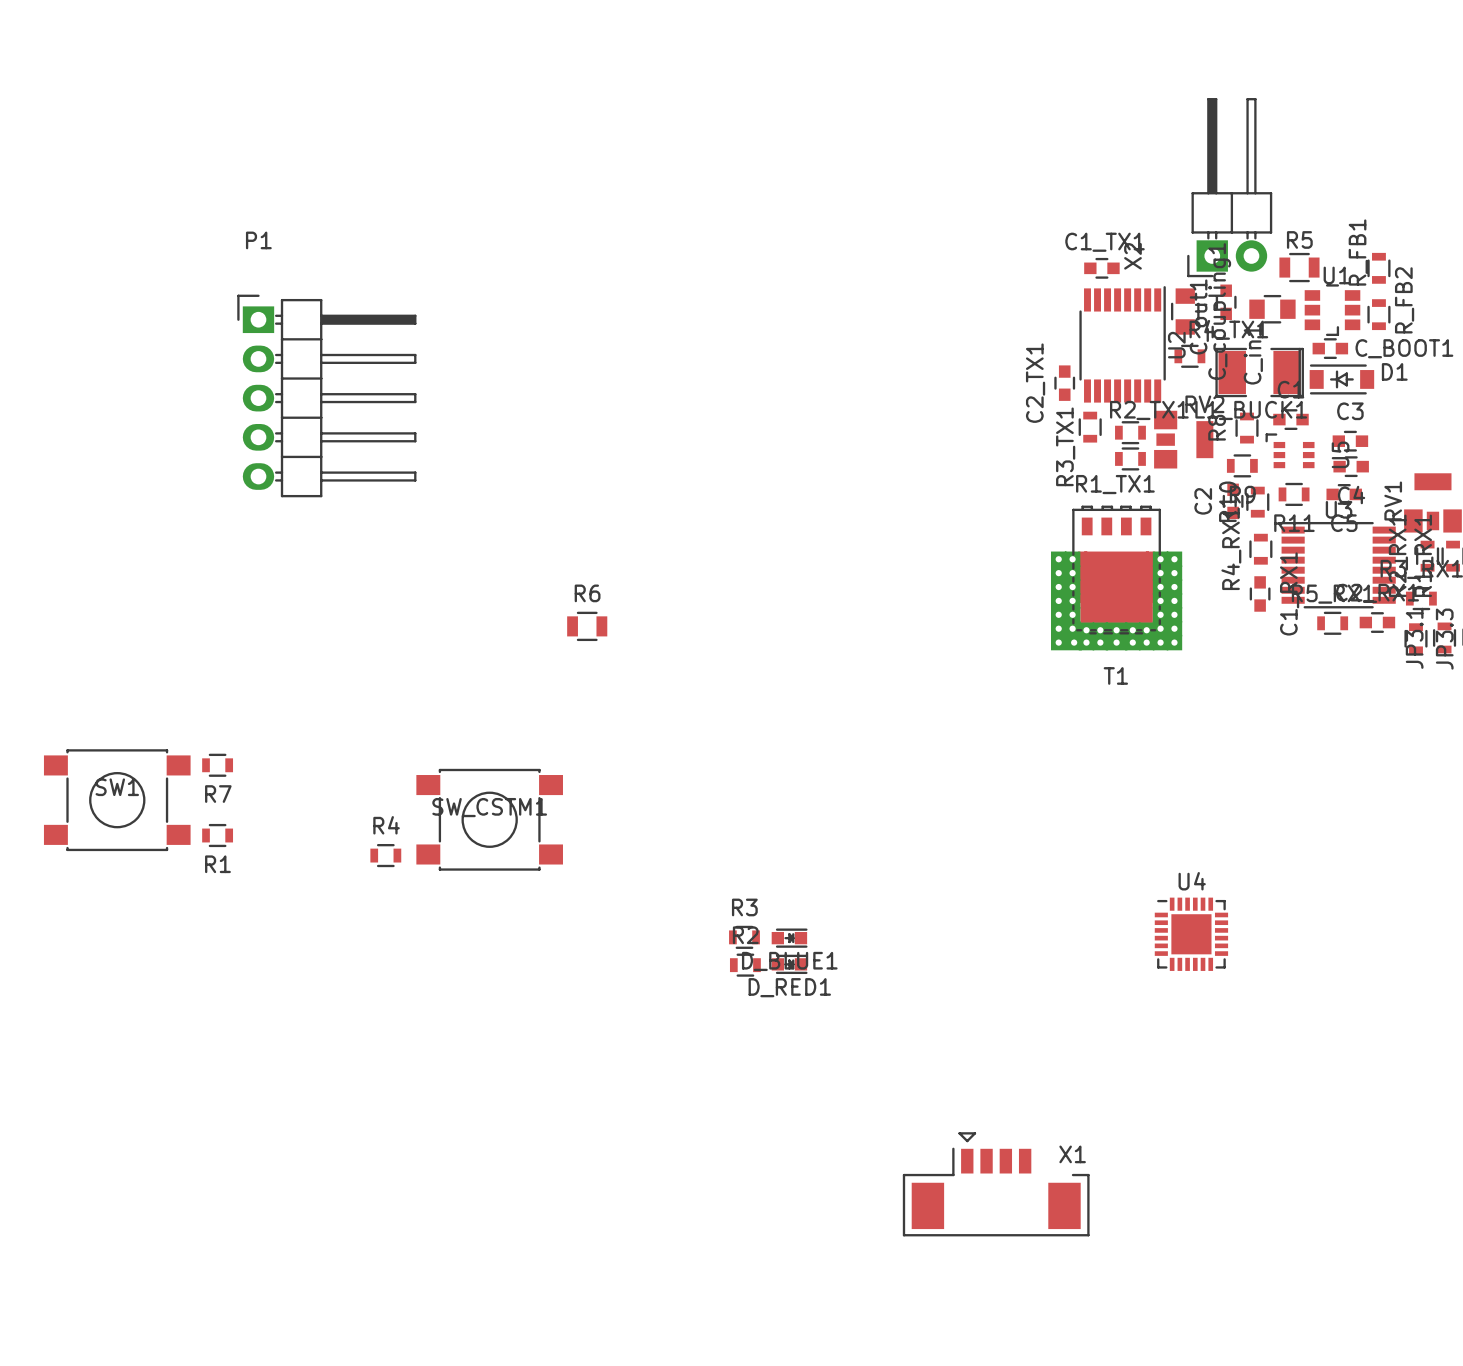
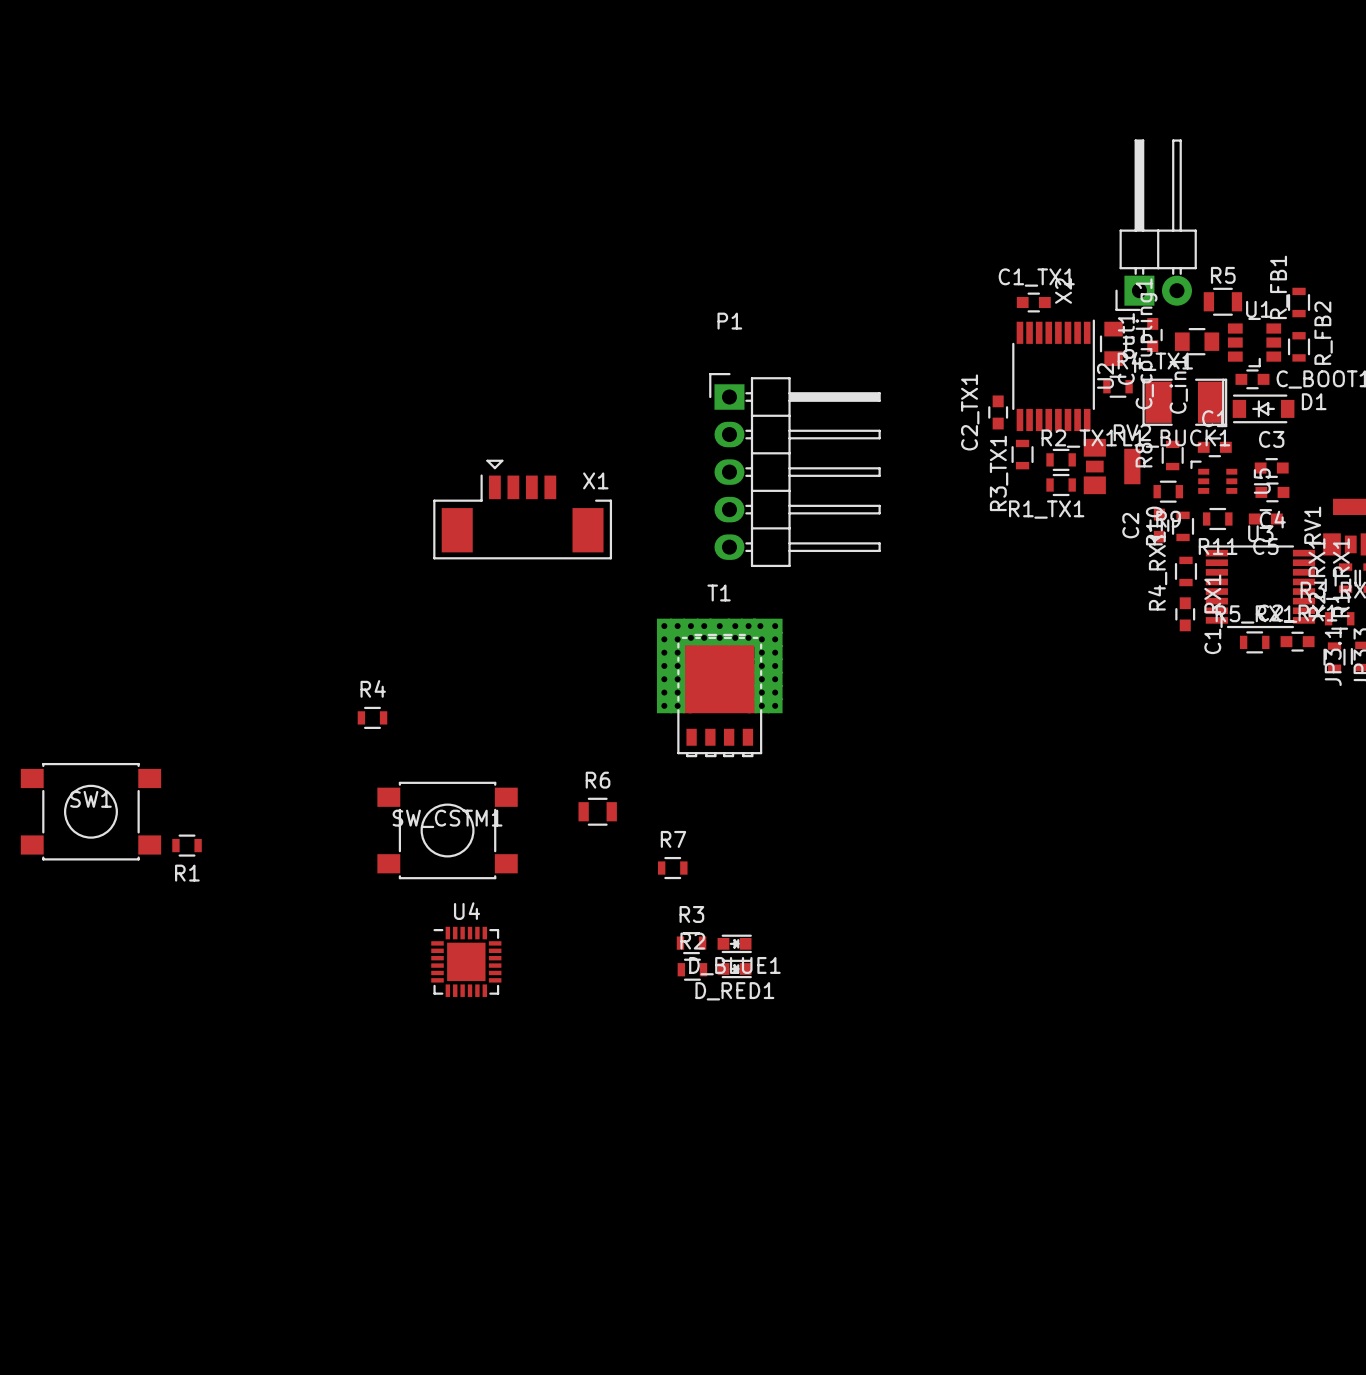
P1 position: (326, 395) -> (794, 470)
T1 rotation: 0° (1116, 577) -> 180° (719, 687)
T1 position: (1116, 577) -> (719, 687)
R6 position: (587, 626) -> (597, 811)
R7 position: (217, 765) -> (672, 868)
R7 name position: R7 (218, 794) -> R7 (673, 839)
R4 position: (385, 855) -> (372, 717)
U4 position: (1191, 934) -> (466, 961)
X1 position: (996, 1184) -> (522, 509)

